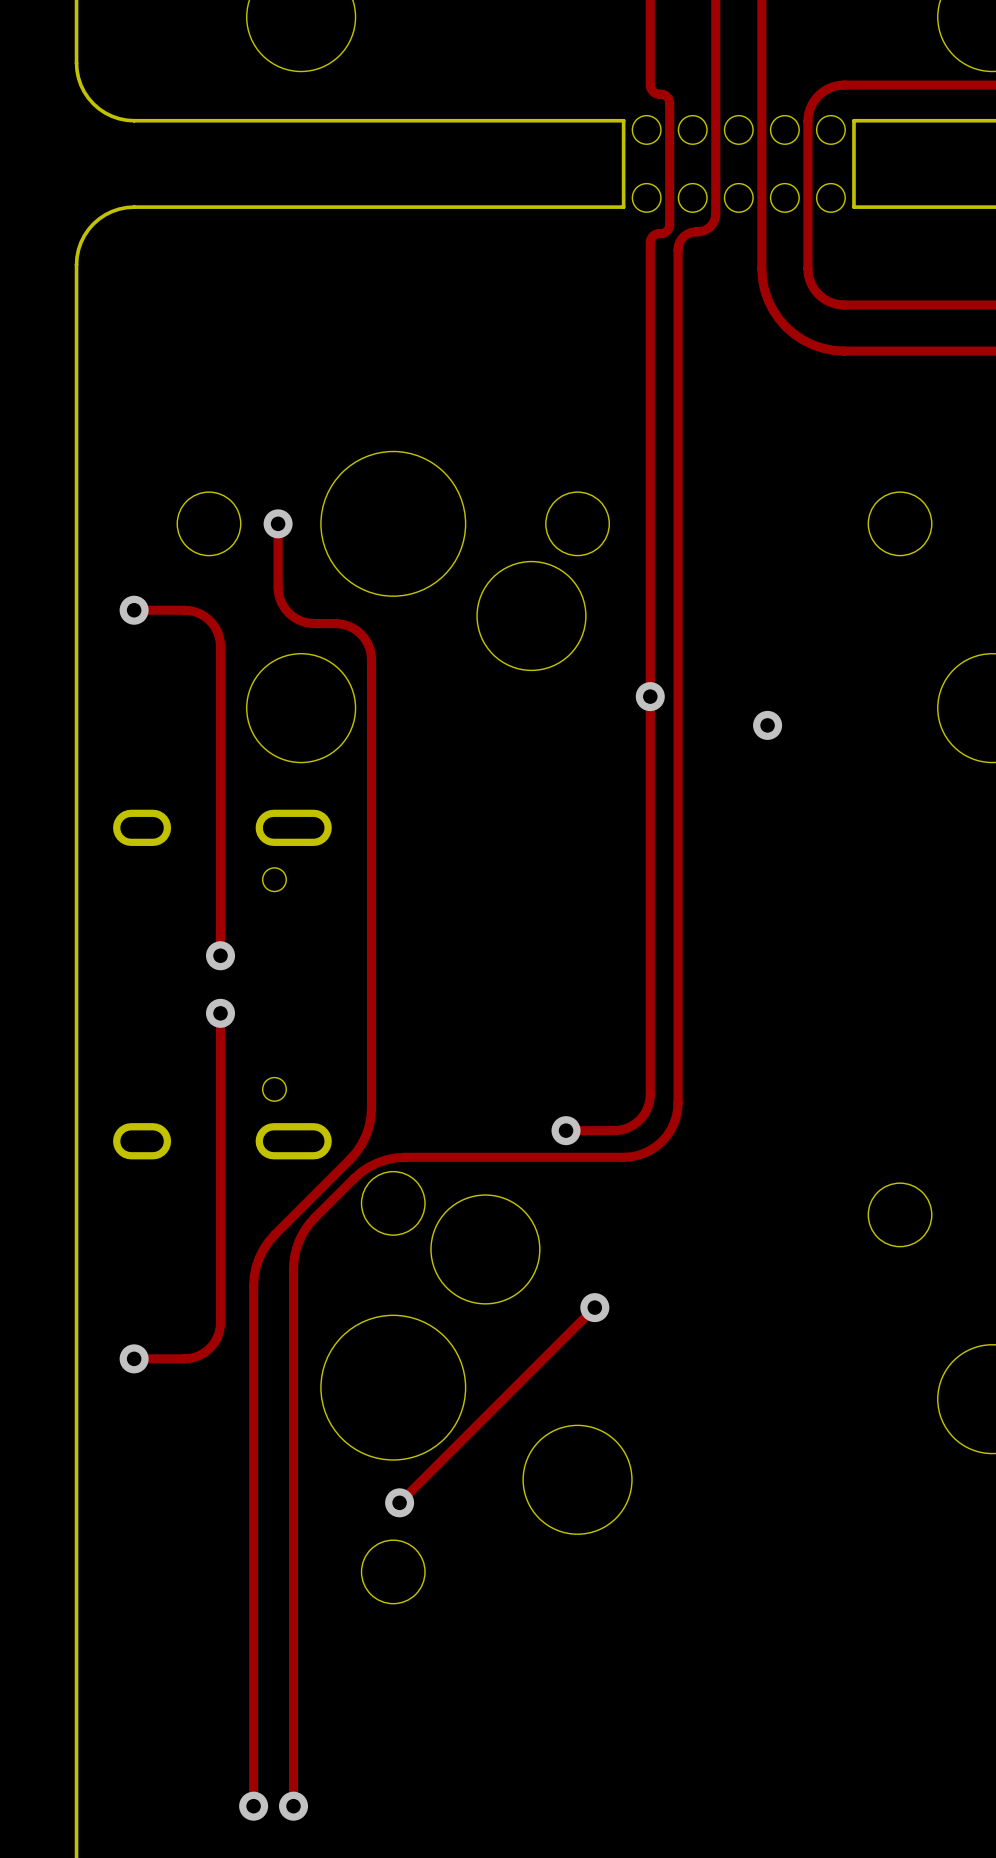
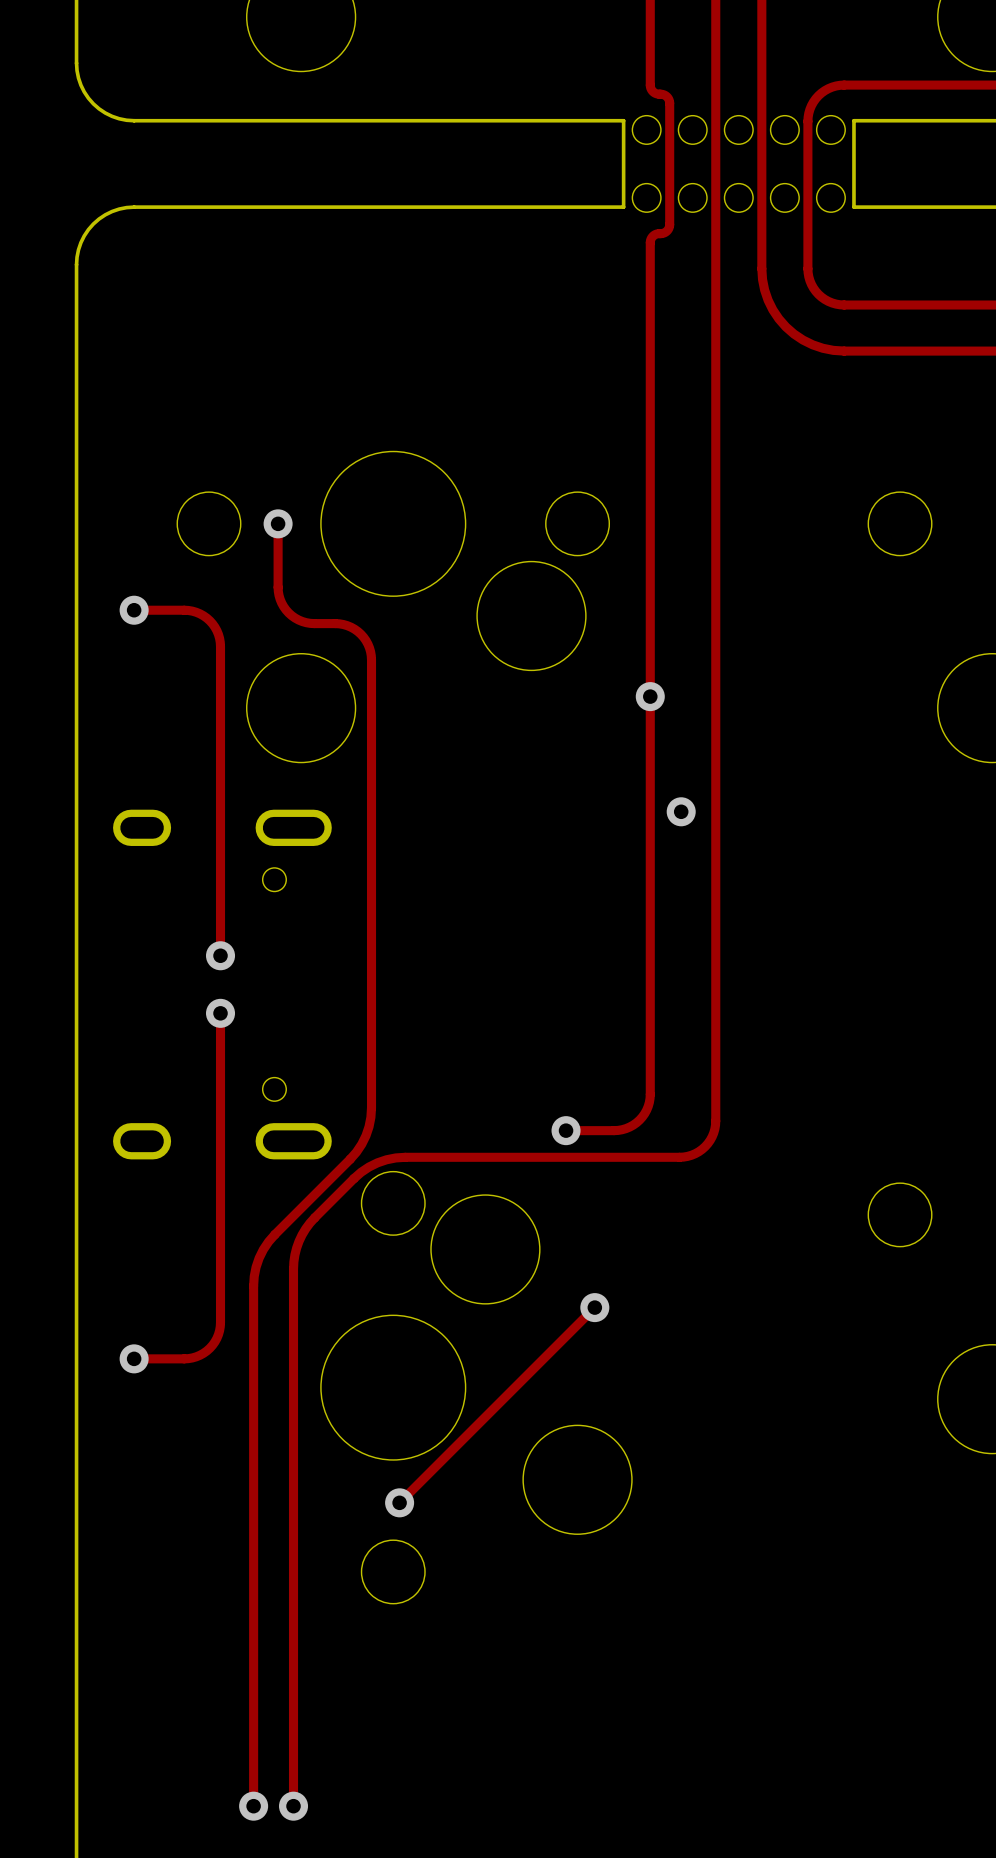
track: (715, 213) (714, 220) (708, 228) (689, 233) (683, 237) (678, 249) (677, 1109) (670, 1130) (662, 1141) (644, 1153) (623, 1157) -> (715, 213) (715, 1125) (707, 1143) (691, 1155) (679, 1157) (623, 1157)
via position: (767, 725) -> (681, 811)

